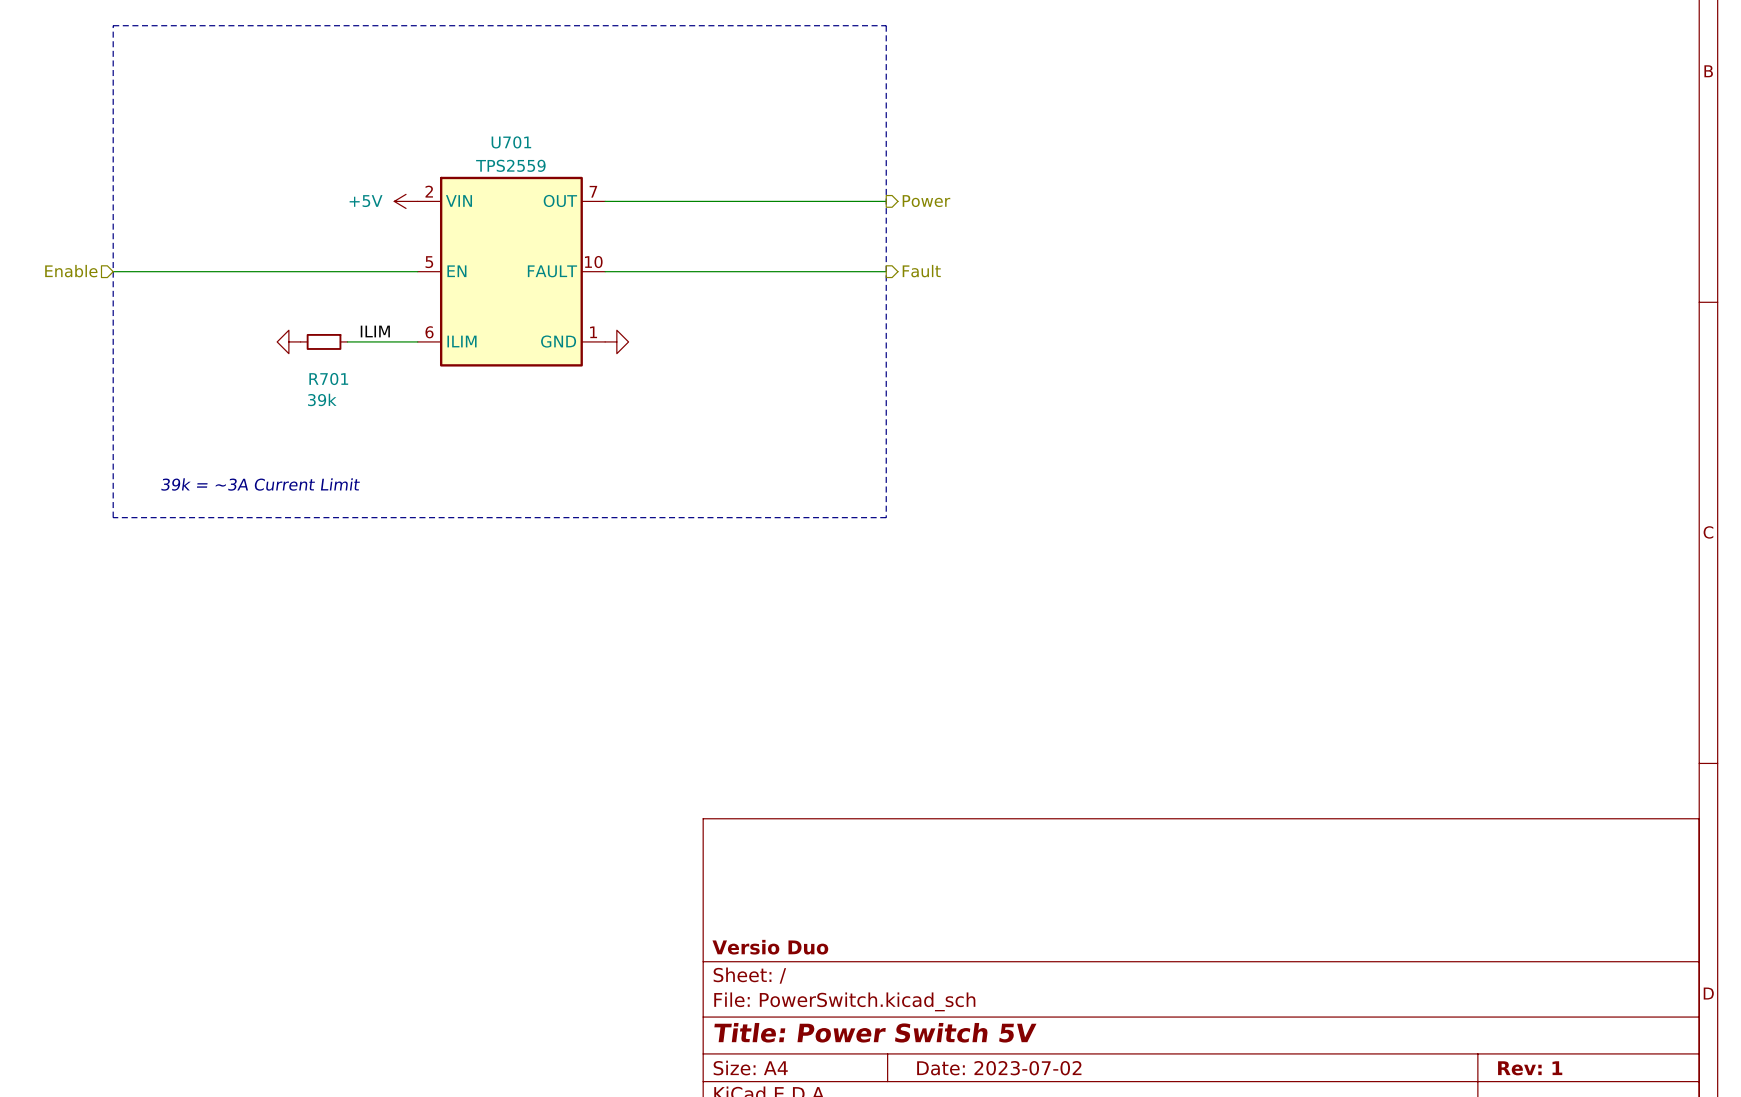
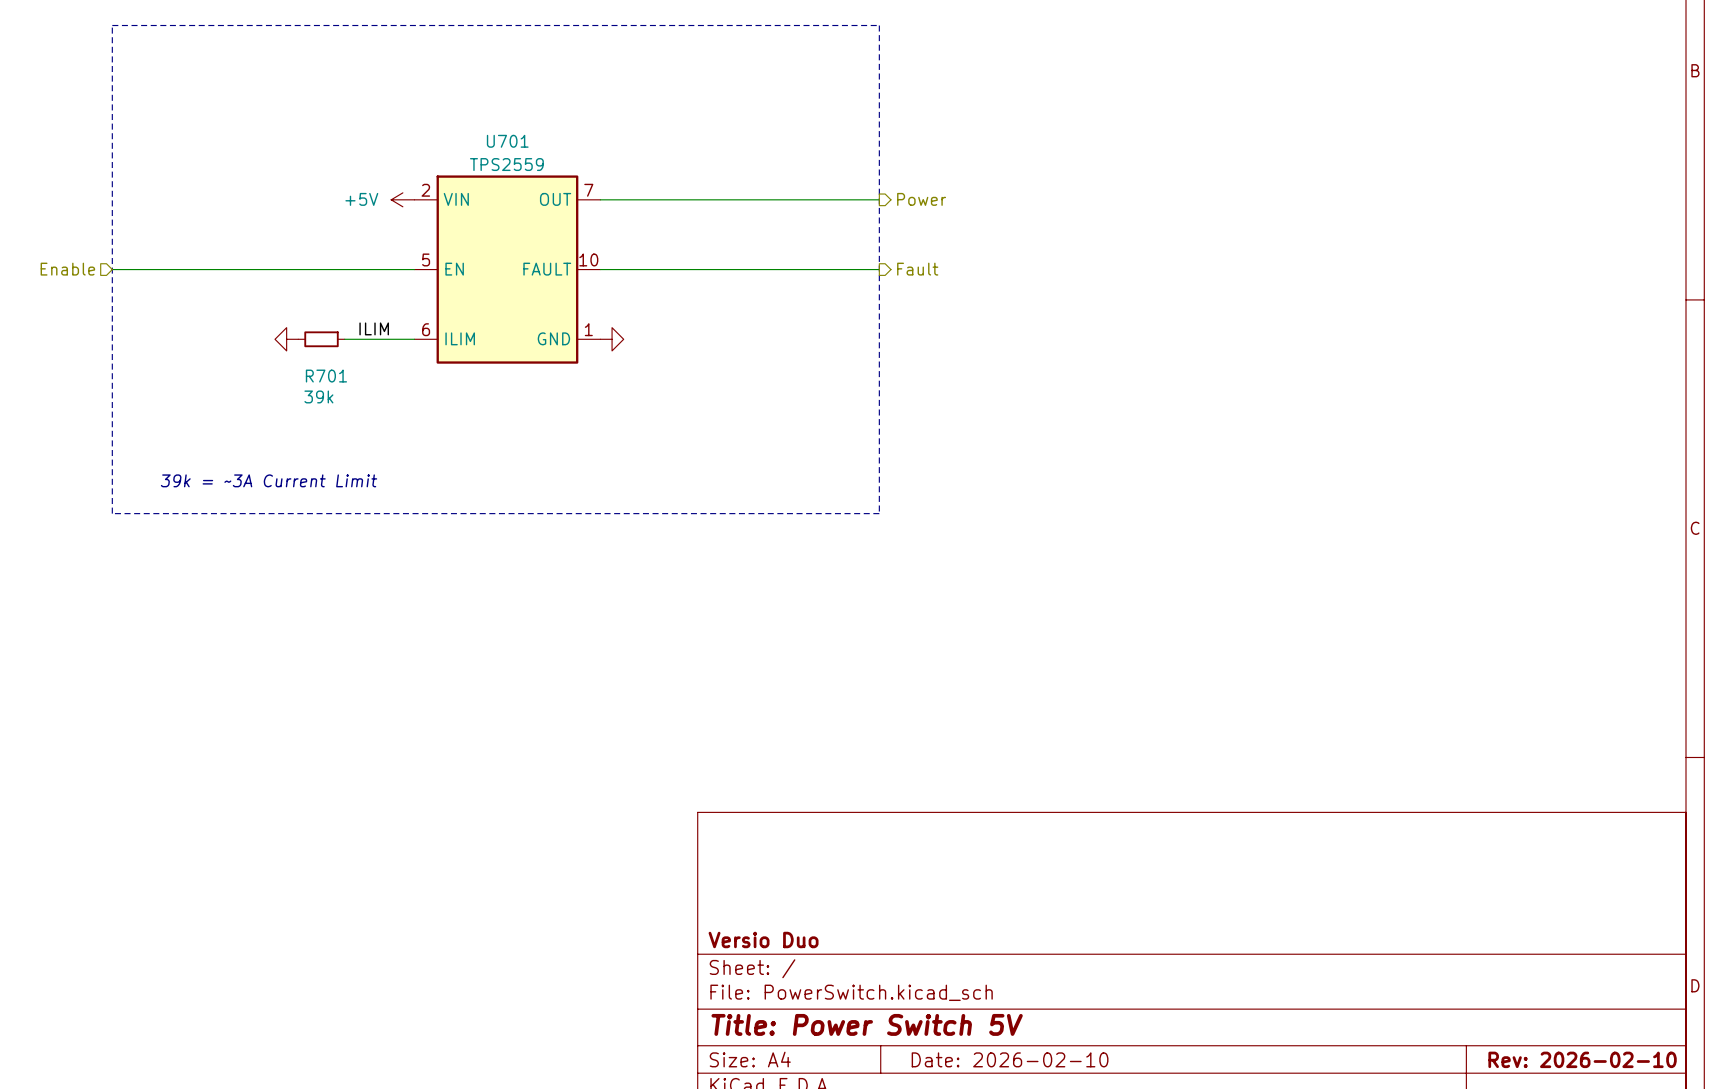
title block: Date: 2023-07-02 (999, 1068) -> Date: 2026-02-10 (1010, 1059)
title block: Rev: 1 (1530, 1068) -> Rev: 2026-02-10 (1582, 1059)

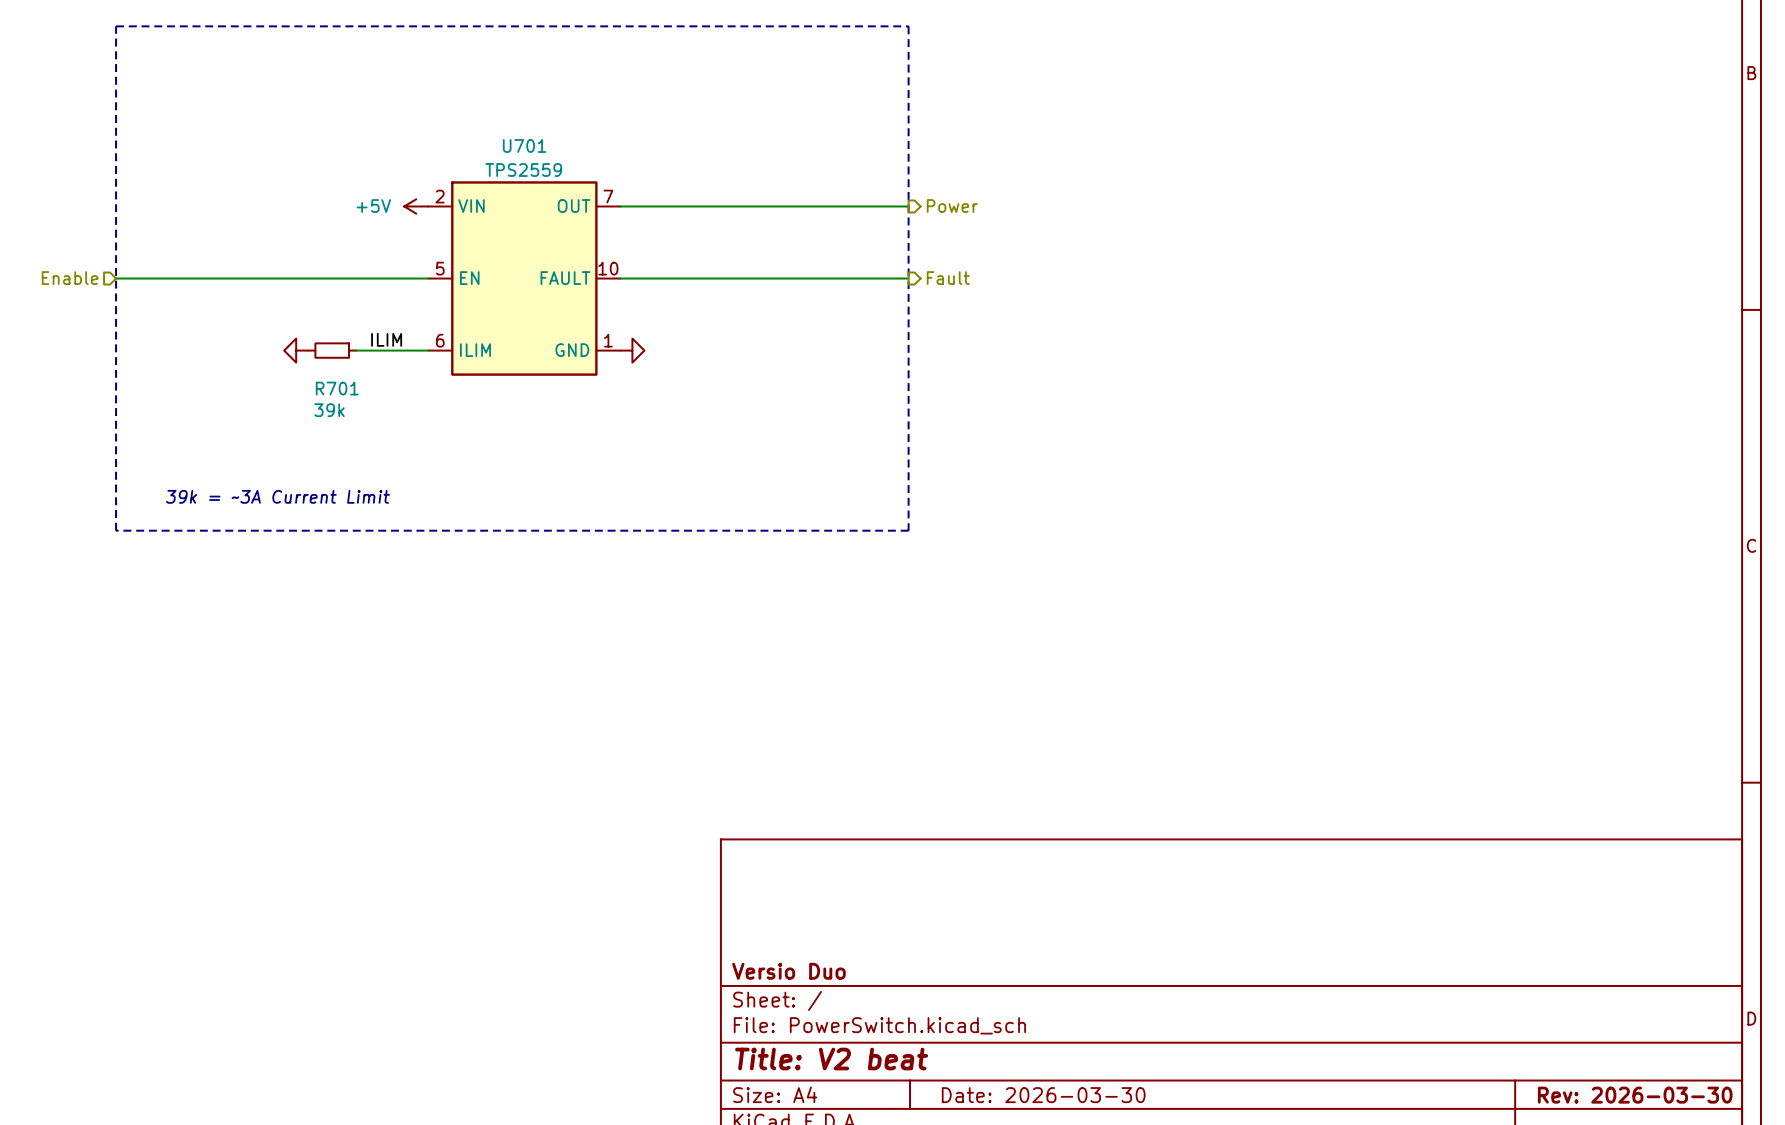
title block: Title: Power Switch 5V (867, 1024) -> Title: V2 beat (831, 1059)
title block: Date: 2026-02-10 (1010, 1059) -> Date: 2026-03-30 (1043, 1095)
title block: Rev: 2026-02-10 (1582, 1059) -> Rev: 2026-03-30 (1635, 1095)

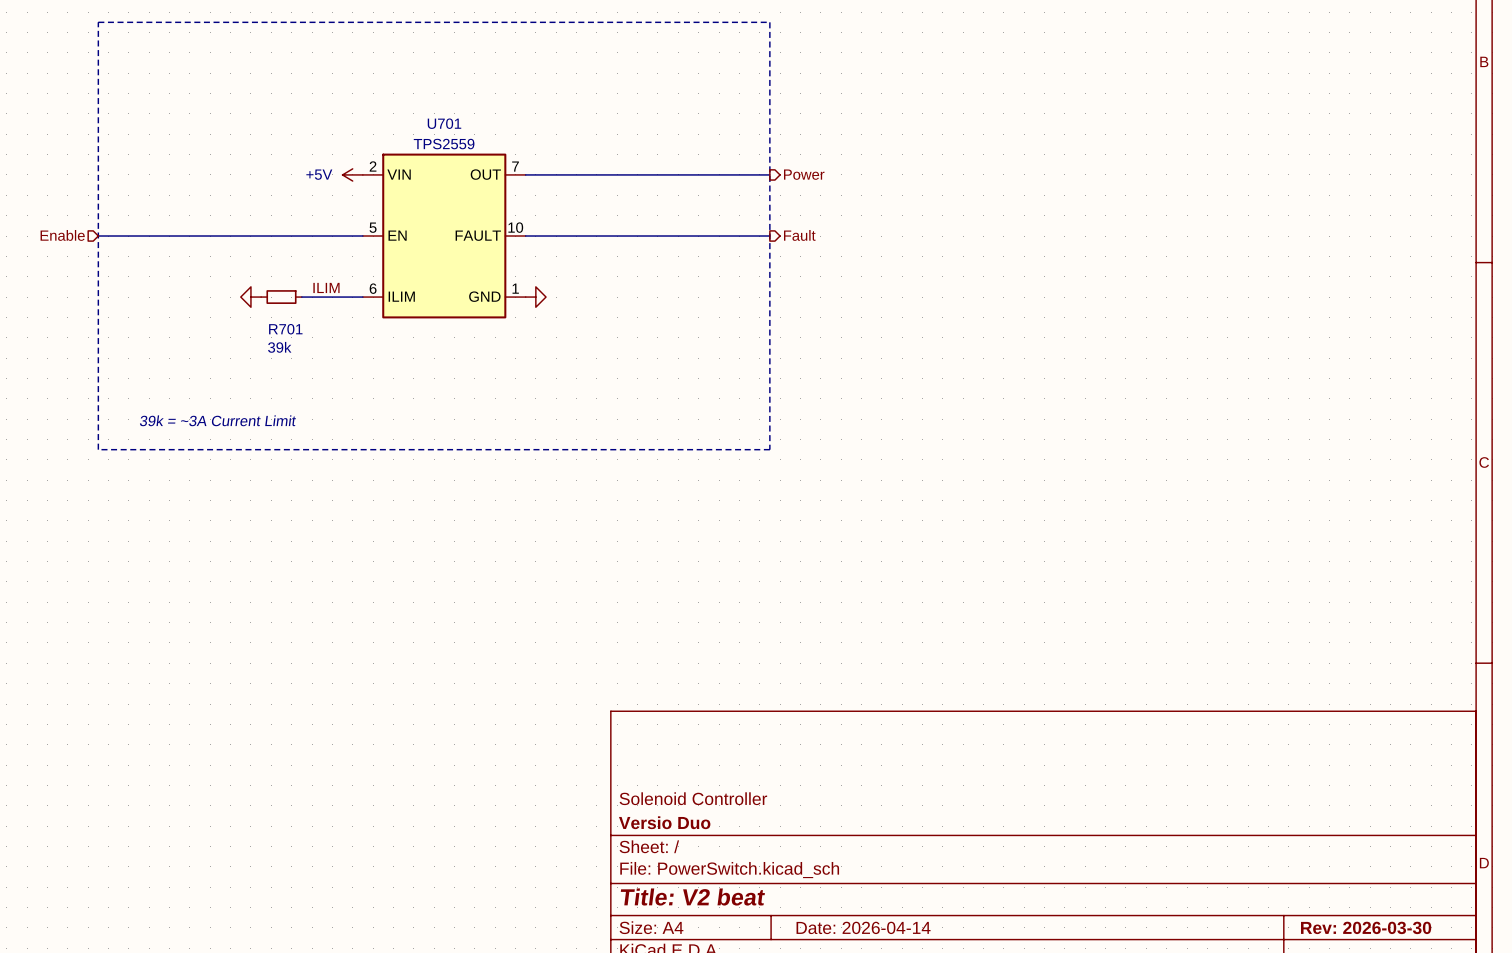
title block: none -> Solenoid Controller (693, 798)
title block: Date: 2026-03-30 (1043, 1095) -> Date: 2026-04-14 (863, 927)

